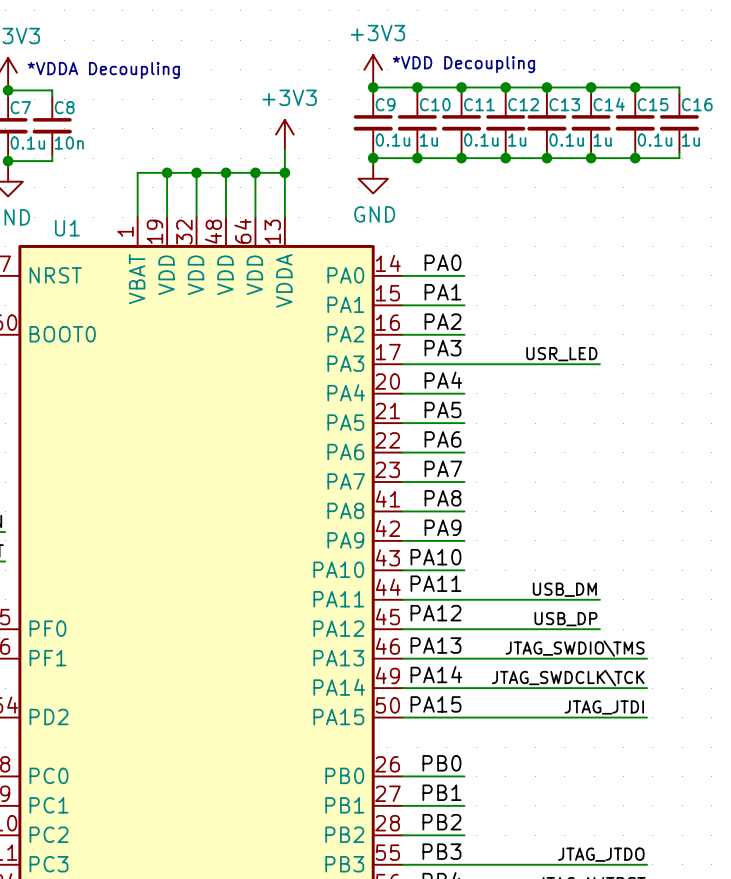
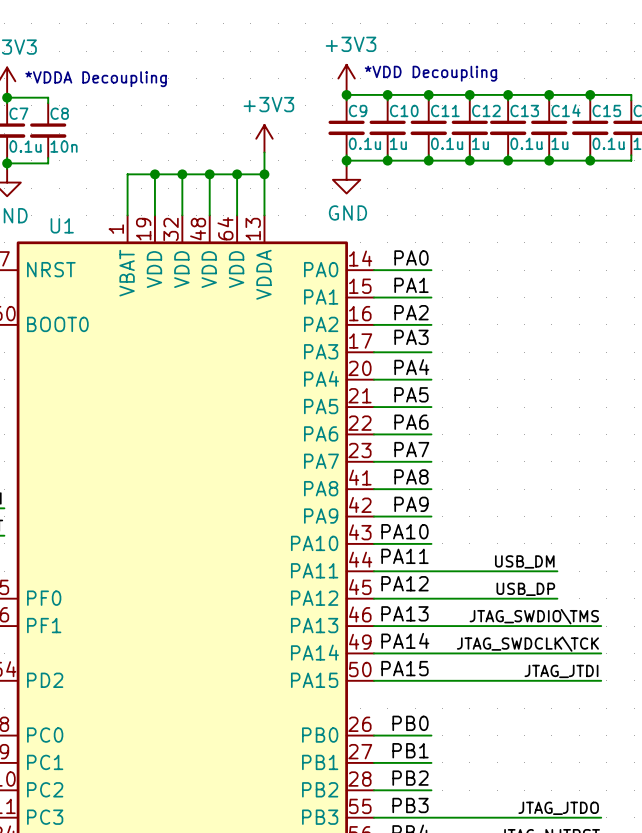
label: USR_LED (561, 354) -> none
wire: (464, 364) (599, 364) -> none

